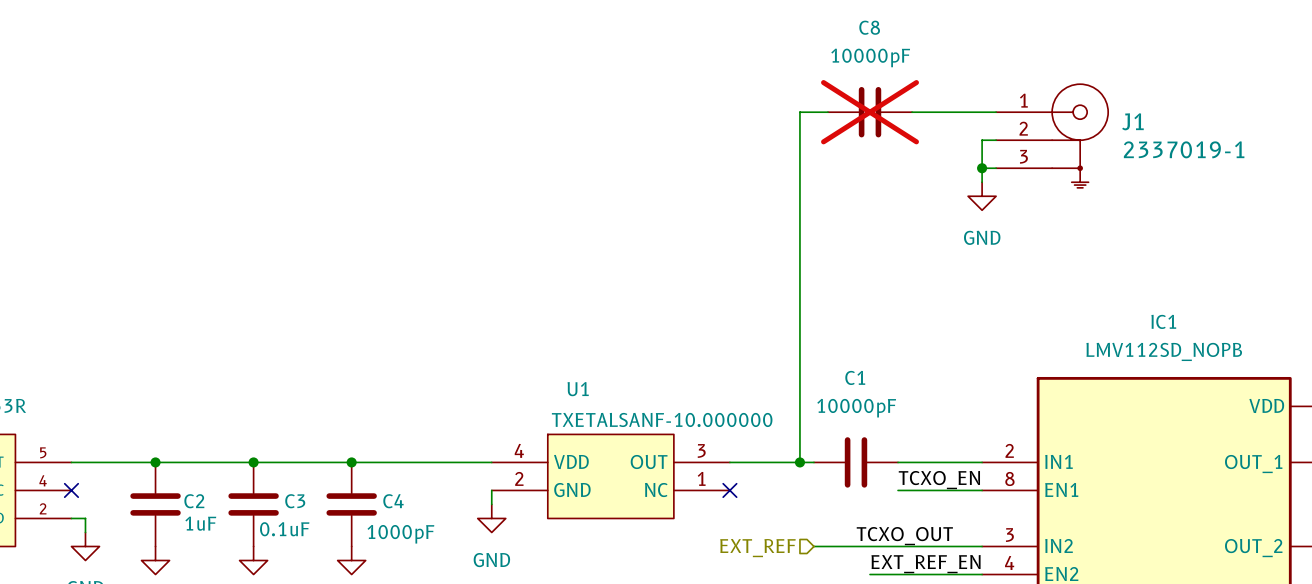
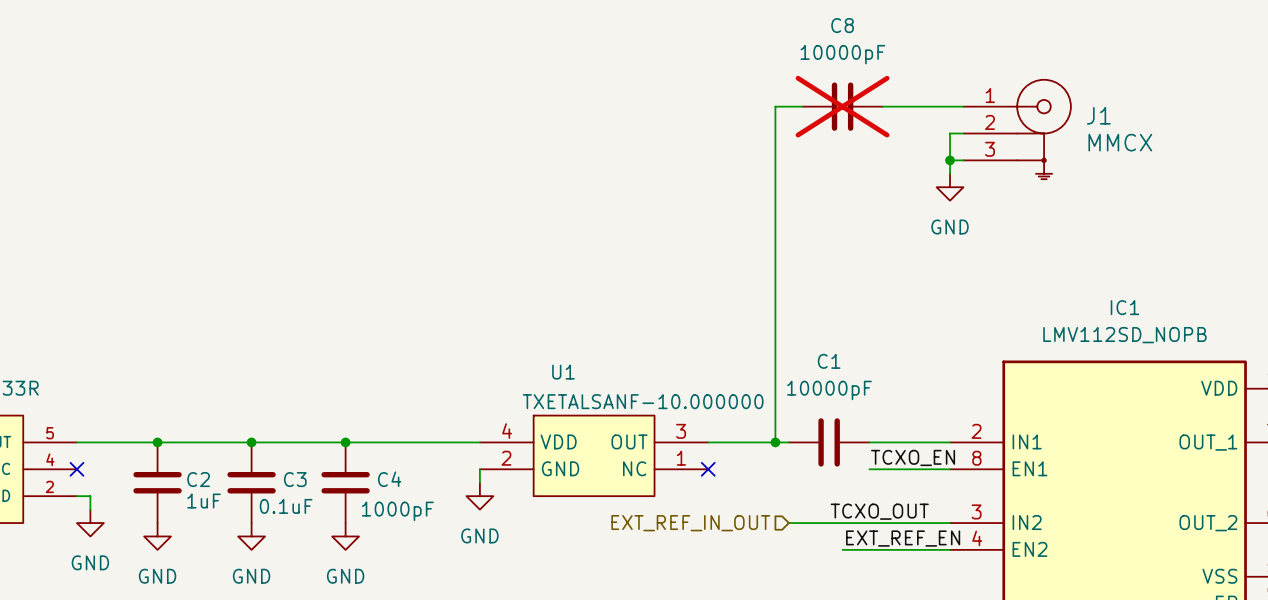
J1 value: 2337019-1 (1184, 149) -> MMCX (1120, 142)
hierarchical label: EXT_REF (757, 548) -> EXT_REF_IN_OUT (690, 523)

